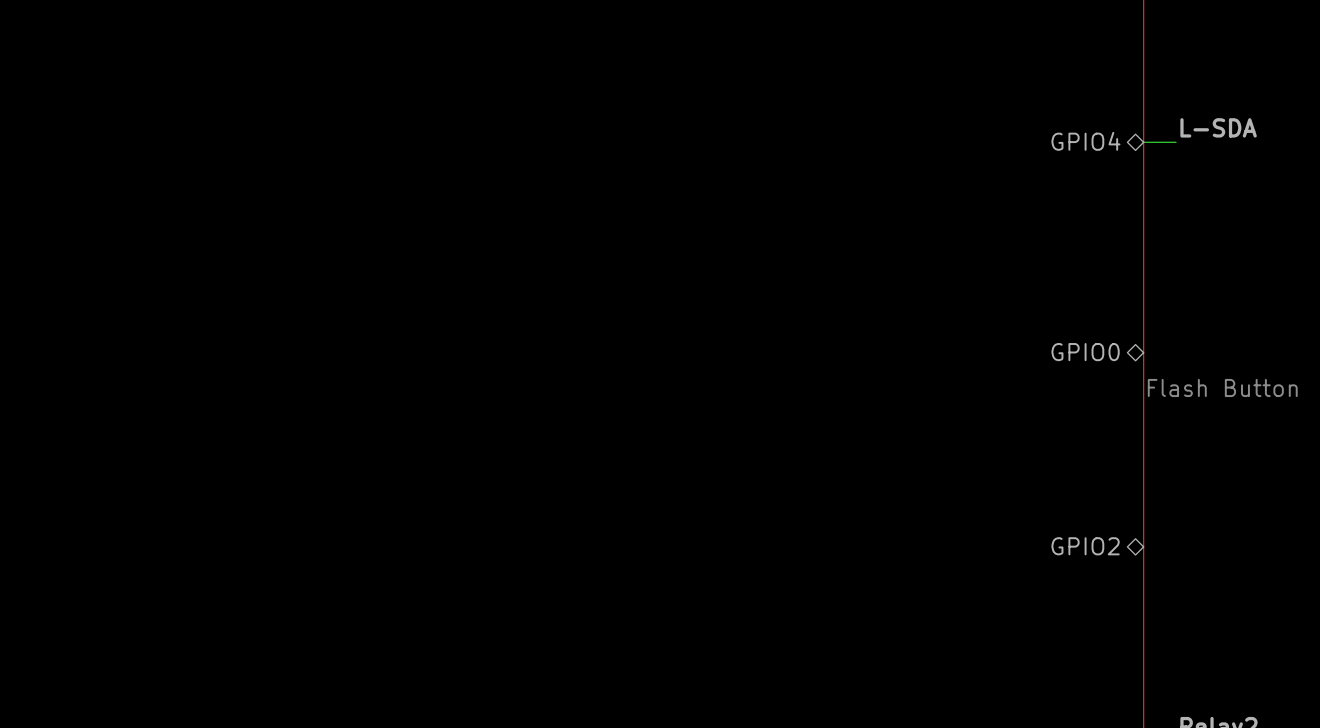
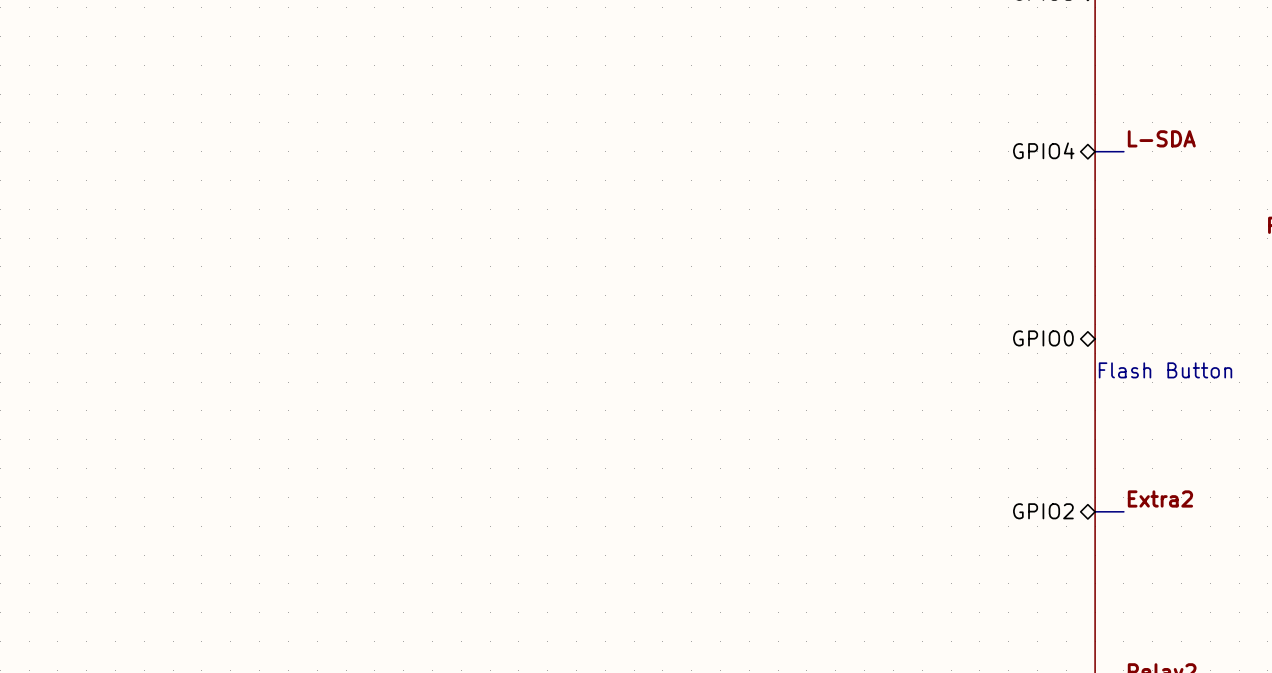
label: none -> Extra2 (1160, 498)
wire: none -> (1095, 511) (1123, 511)

